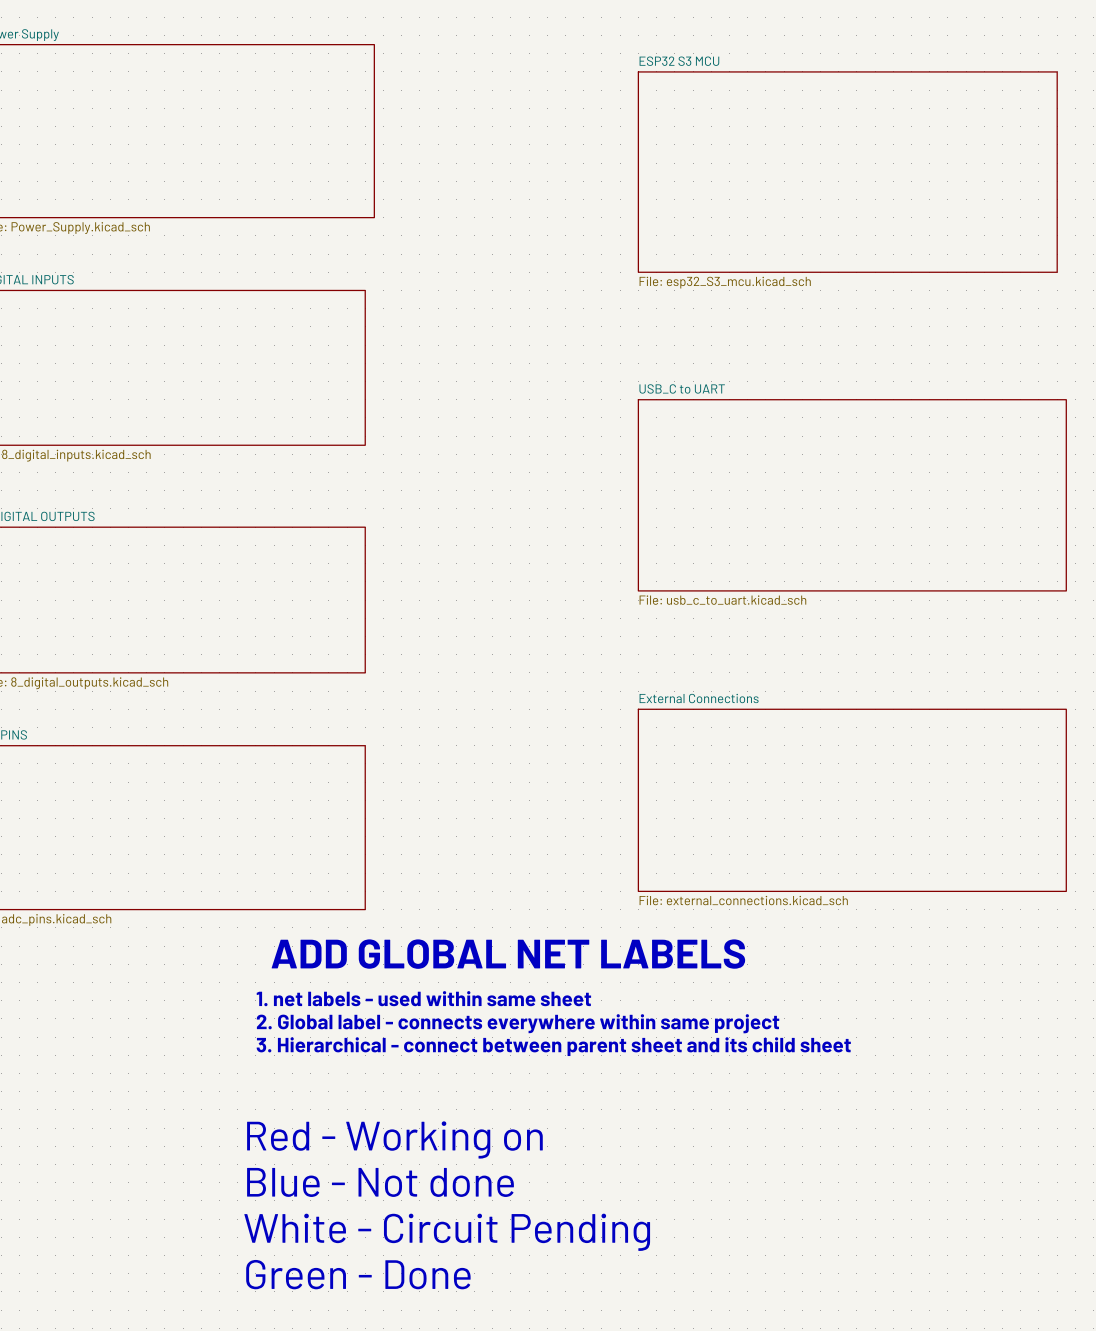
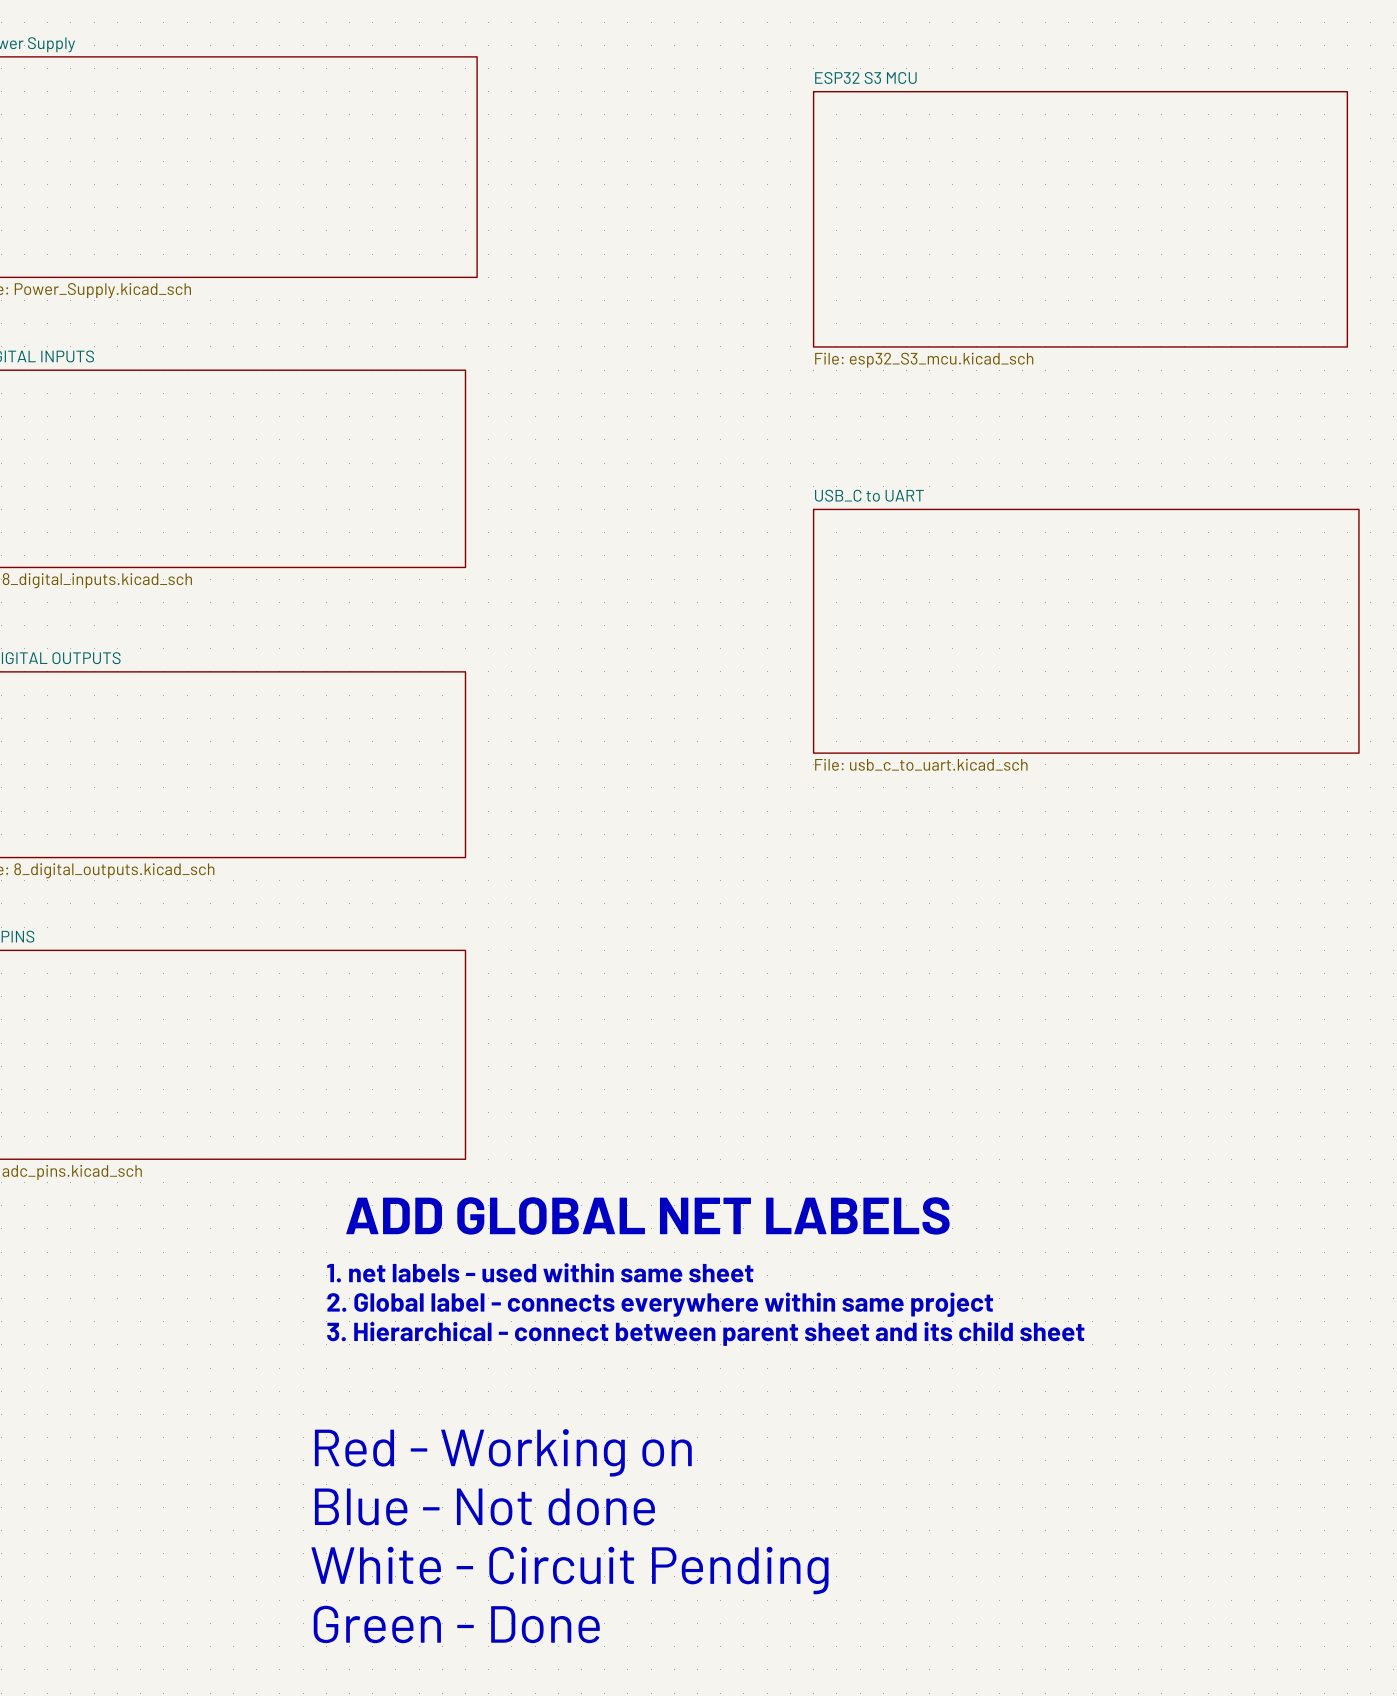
sheet External Connections: File: external_connections.kicad_sch (852, 800) -> none

